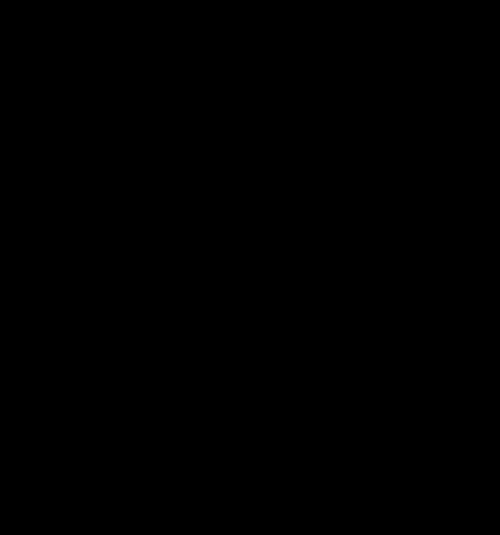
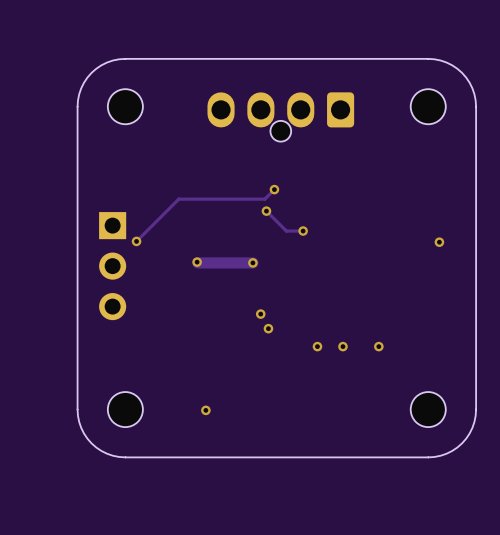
board edge: none -> (428, 58) (125, 58) (113, 60) (101, 65) (87, 77) (81, 88) (77, 106) (77, 409) (81, 427) (87, 438) (96, 447) (113, 455) (125, 457) (428, 457) (446, 453) (457, 447) (466, 438) (472, 427) (476, 409) (475, 100) (469, 82) (457, 68) (440, 60) (428, 58)
part: none -> (125, 106)
part: none -> (428, 106)
part: none -> (280, 116)
track: none -> (274, 189) (264, 199) (178, 199) (136, 241)
via: none -> (274, 189)
track: none -> (266, 211) (286, 231) (303, 231)
via: none -> (266, 211)
via: none -> (303, 231)
via: none -> (136, 241)
via: none -> (439, 242)
track: none -> (197, 262) (252, 262)
via: none -> (197, 262)
via: none -> (252, 262)
part: none -> (112, 266)
via: none -> (260, 314)
via: none -> (268, 328)
via: none -> (317, 346)
via: none -> (342, 346)
via: none -> (378, 346)
part: none -> (125, 409)
part: none -> (428, 409)
via: none -> (205, 410)

